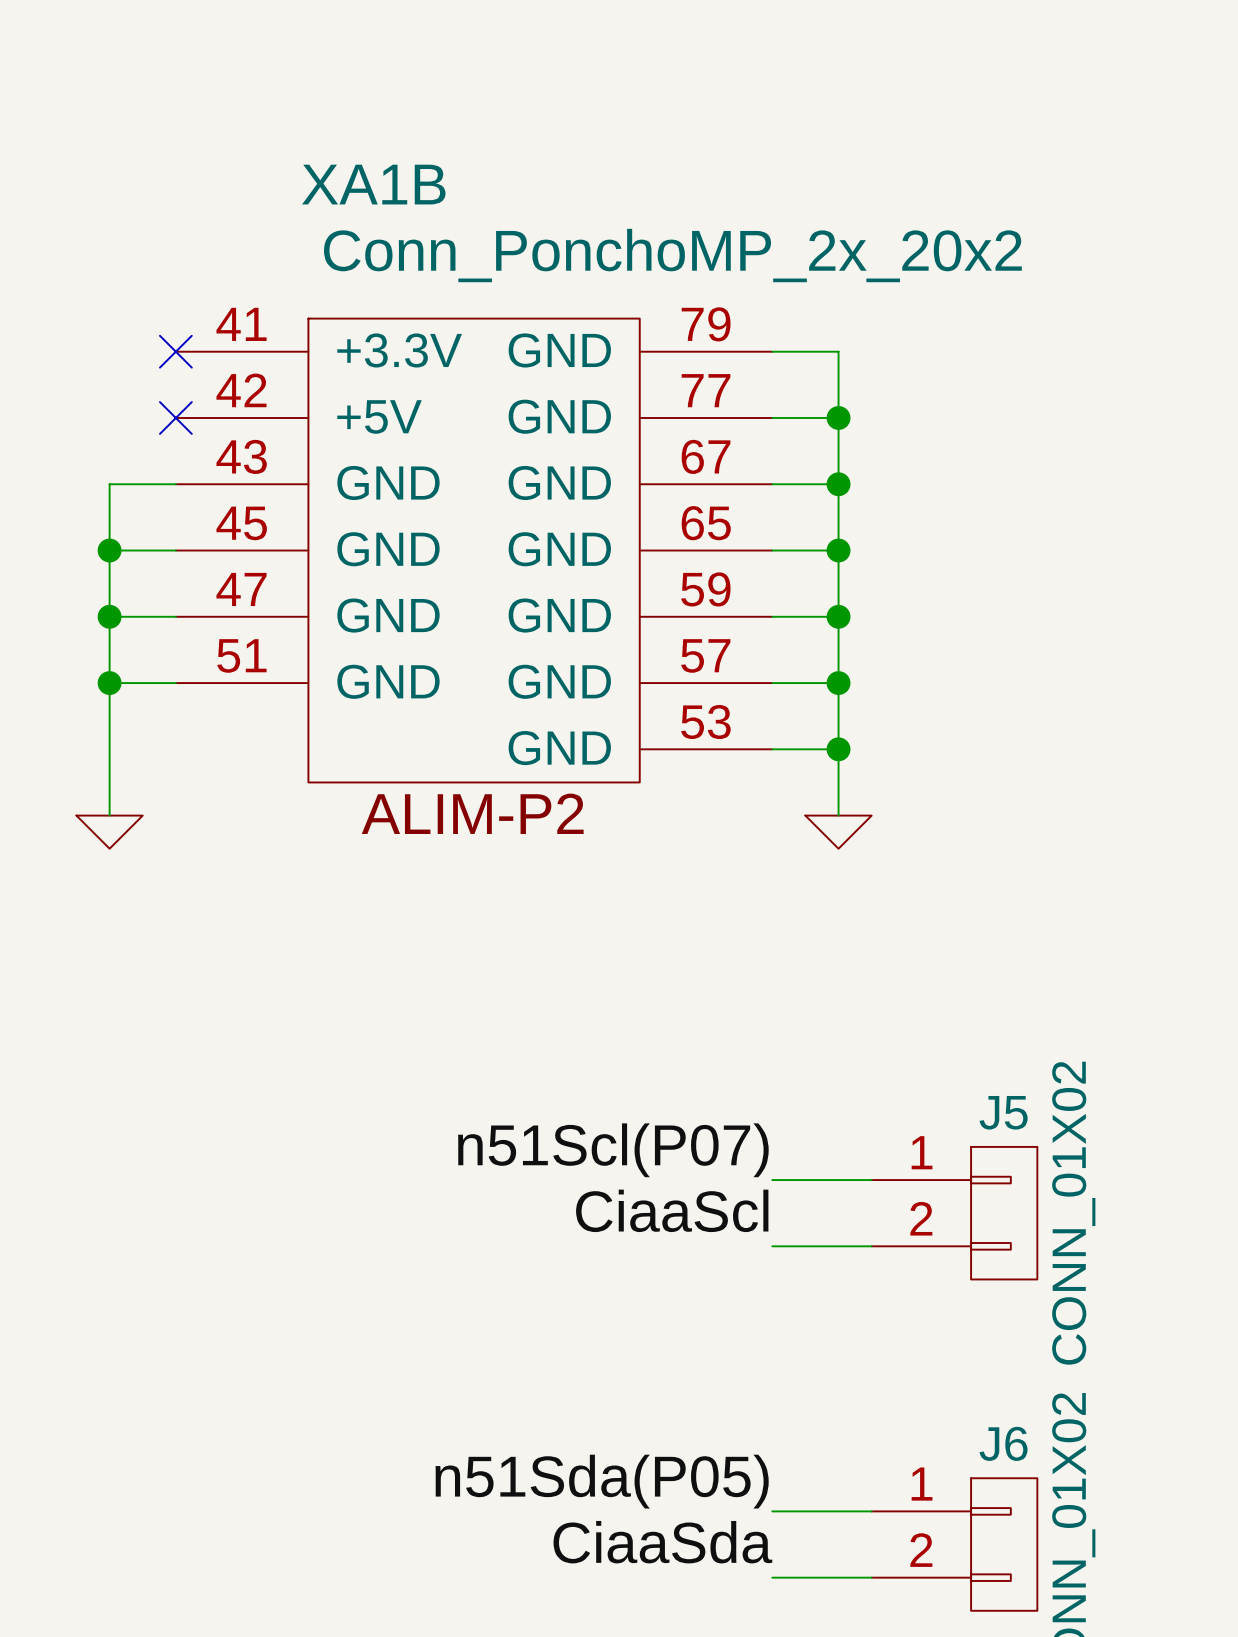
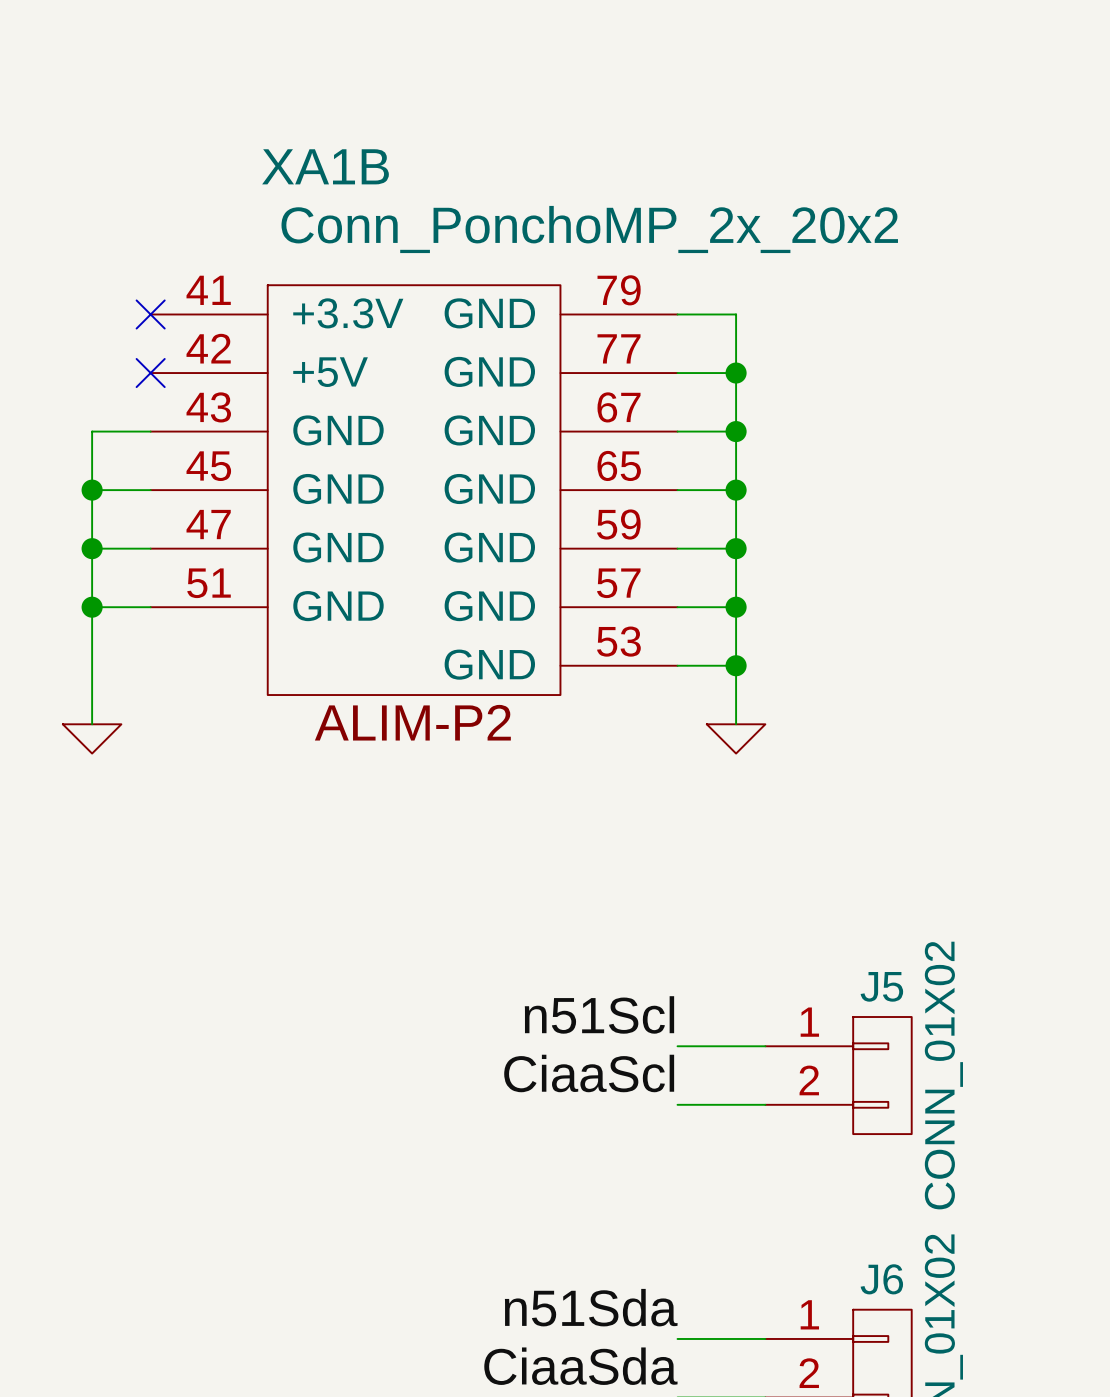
label: n51Scl(P07) (613, 1150) -> n51Scl (599, 1014)
label: n51Sda(P05) (602, 1481) -> n51Sda (591, 1307)

